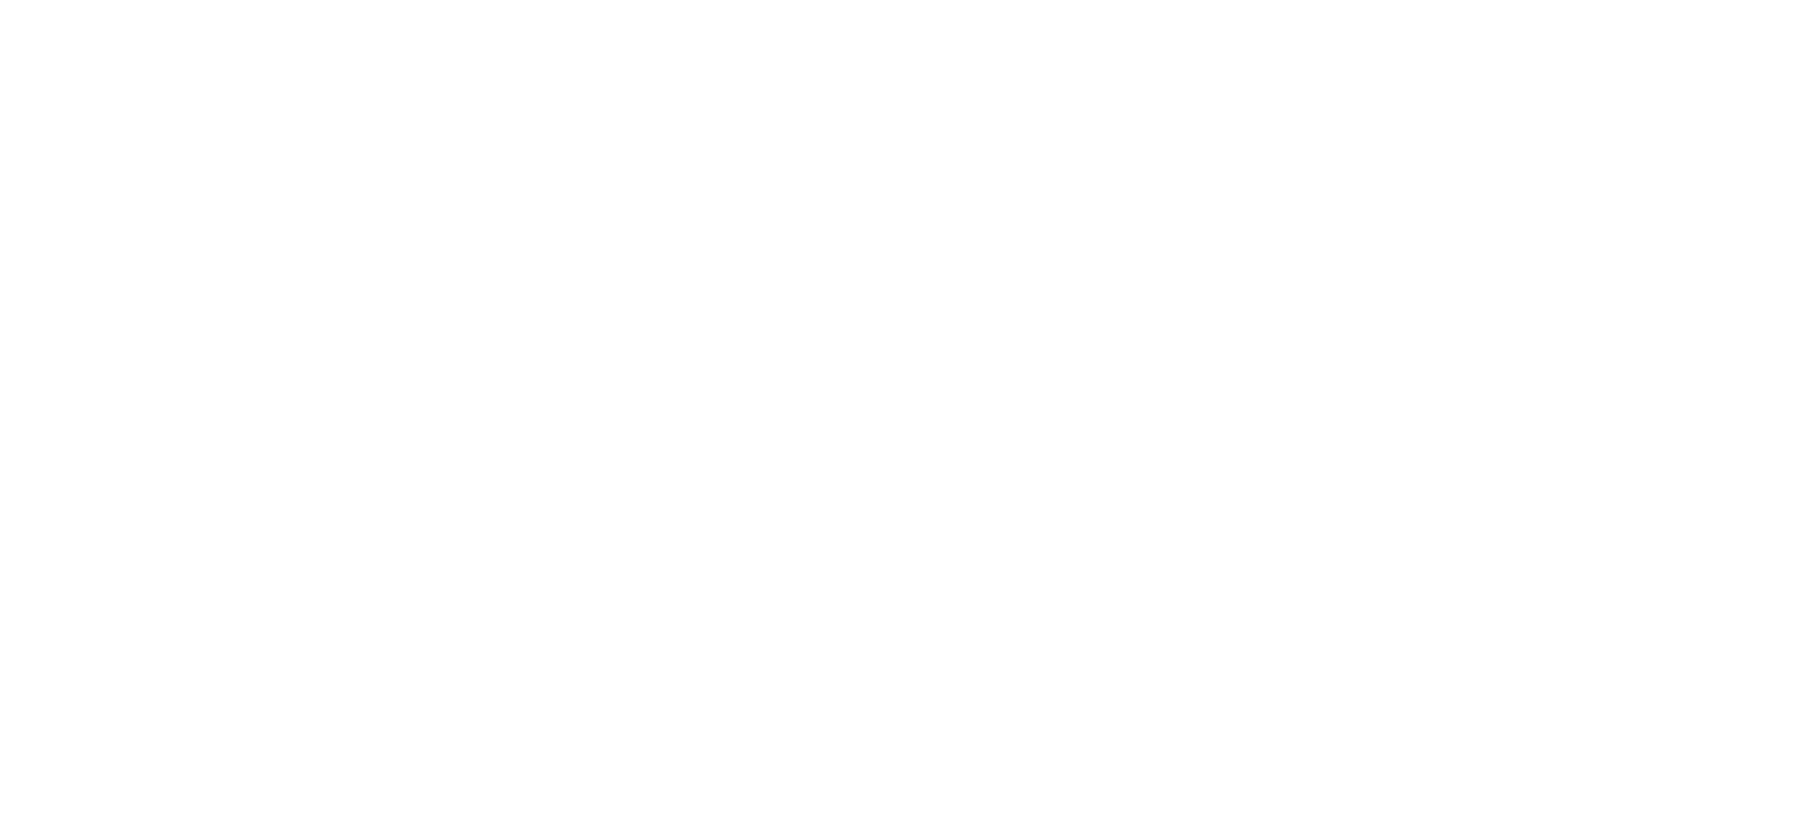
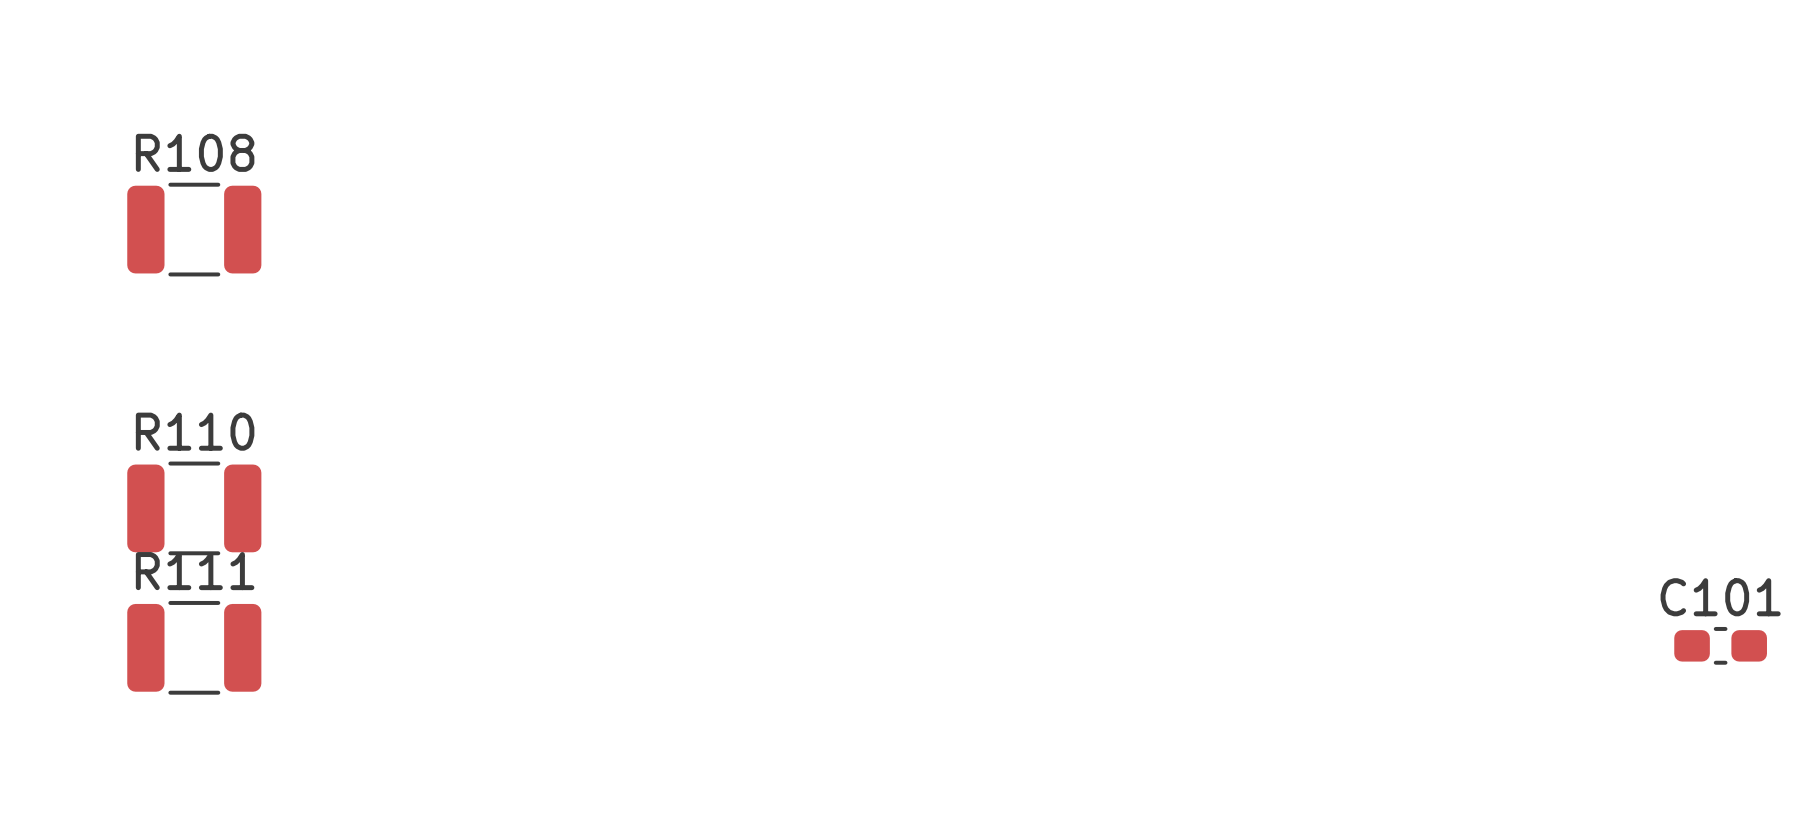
R108: none -> (194, 229)
R110: none -> (194, 508)
C101: none -> (1720, 645)
R111: none -> (194, 647)

